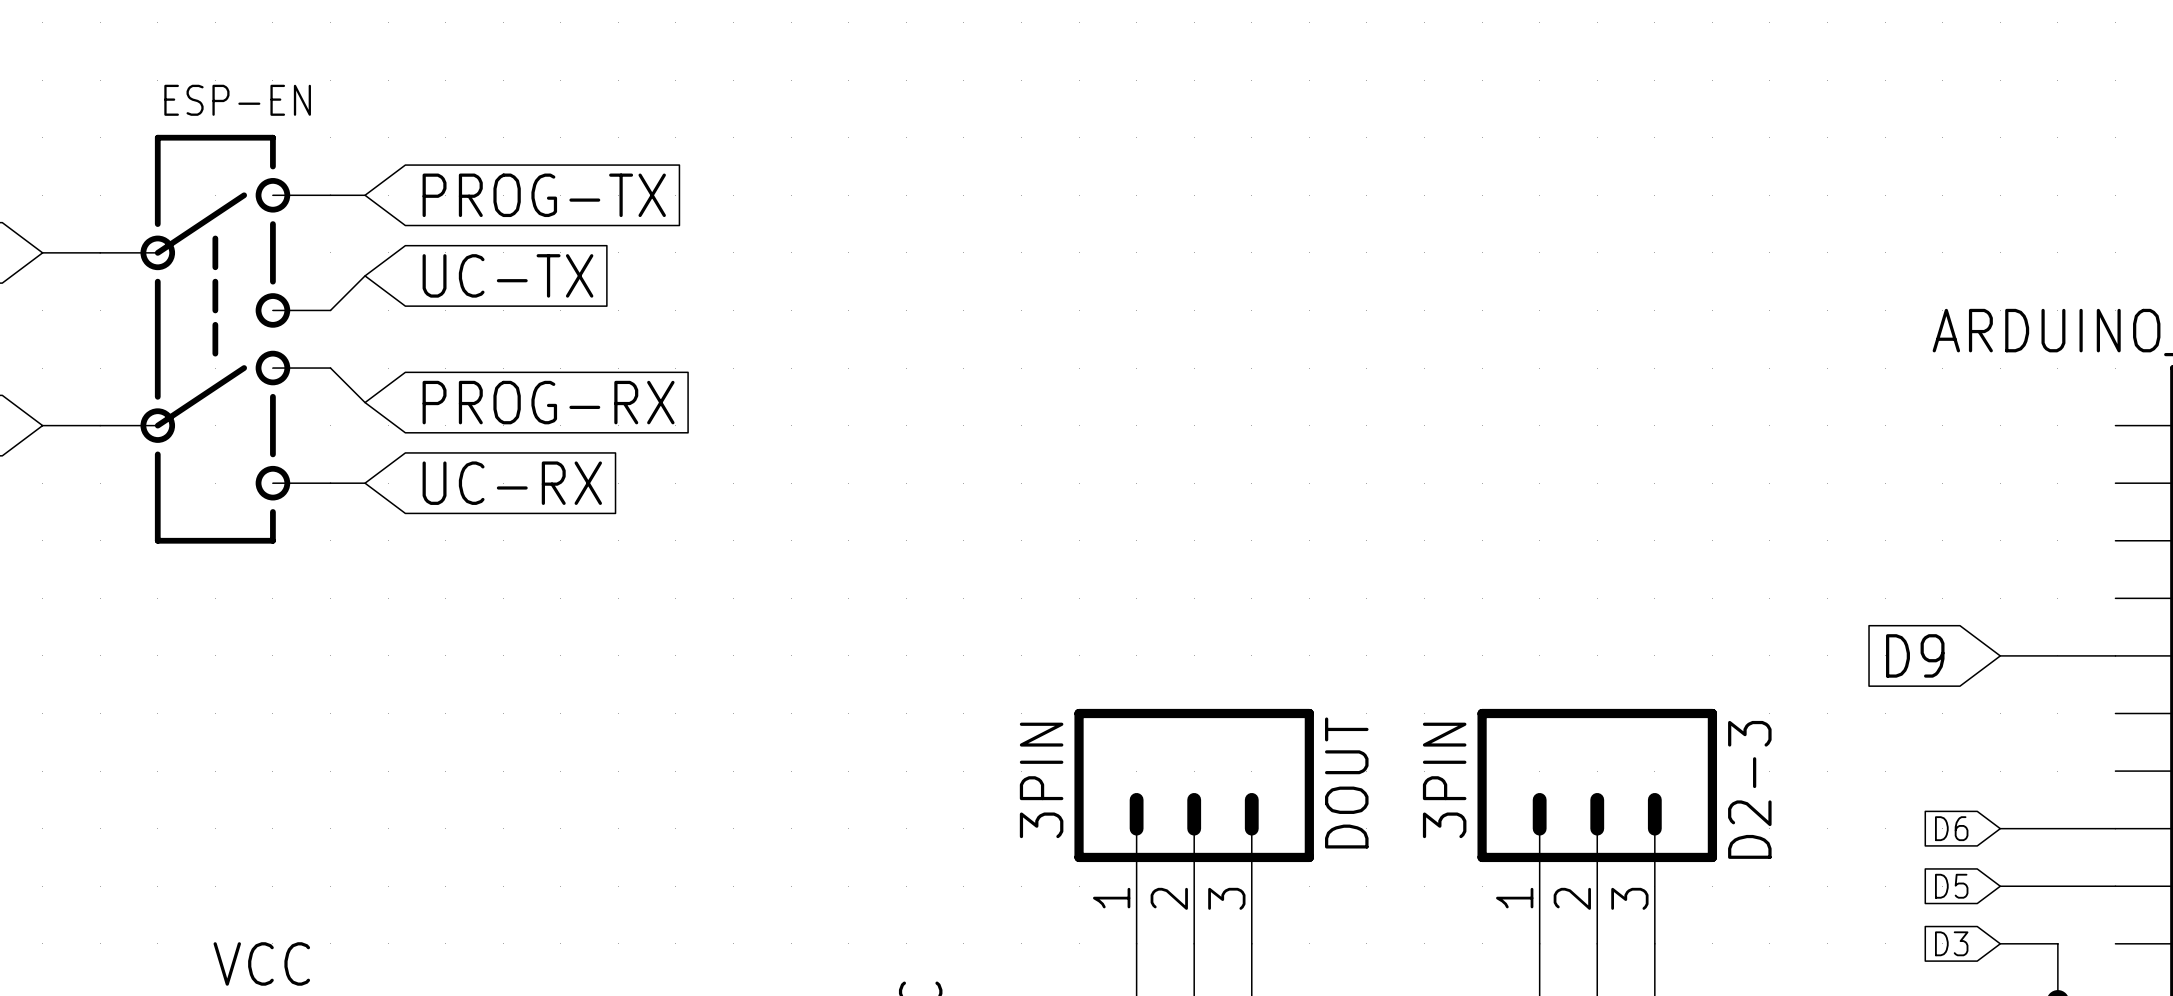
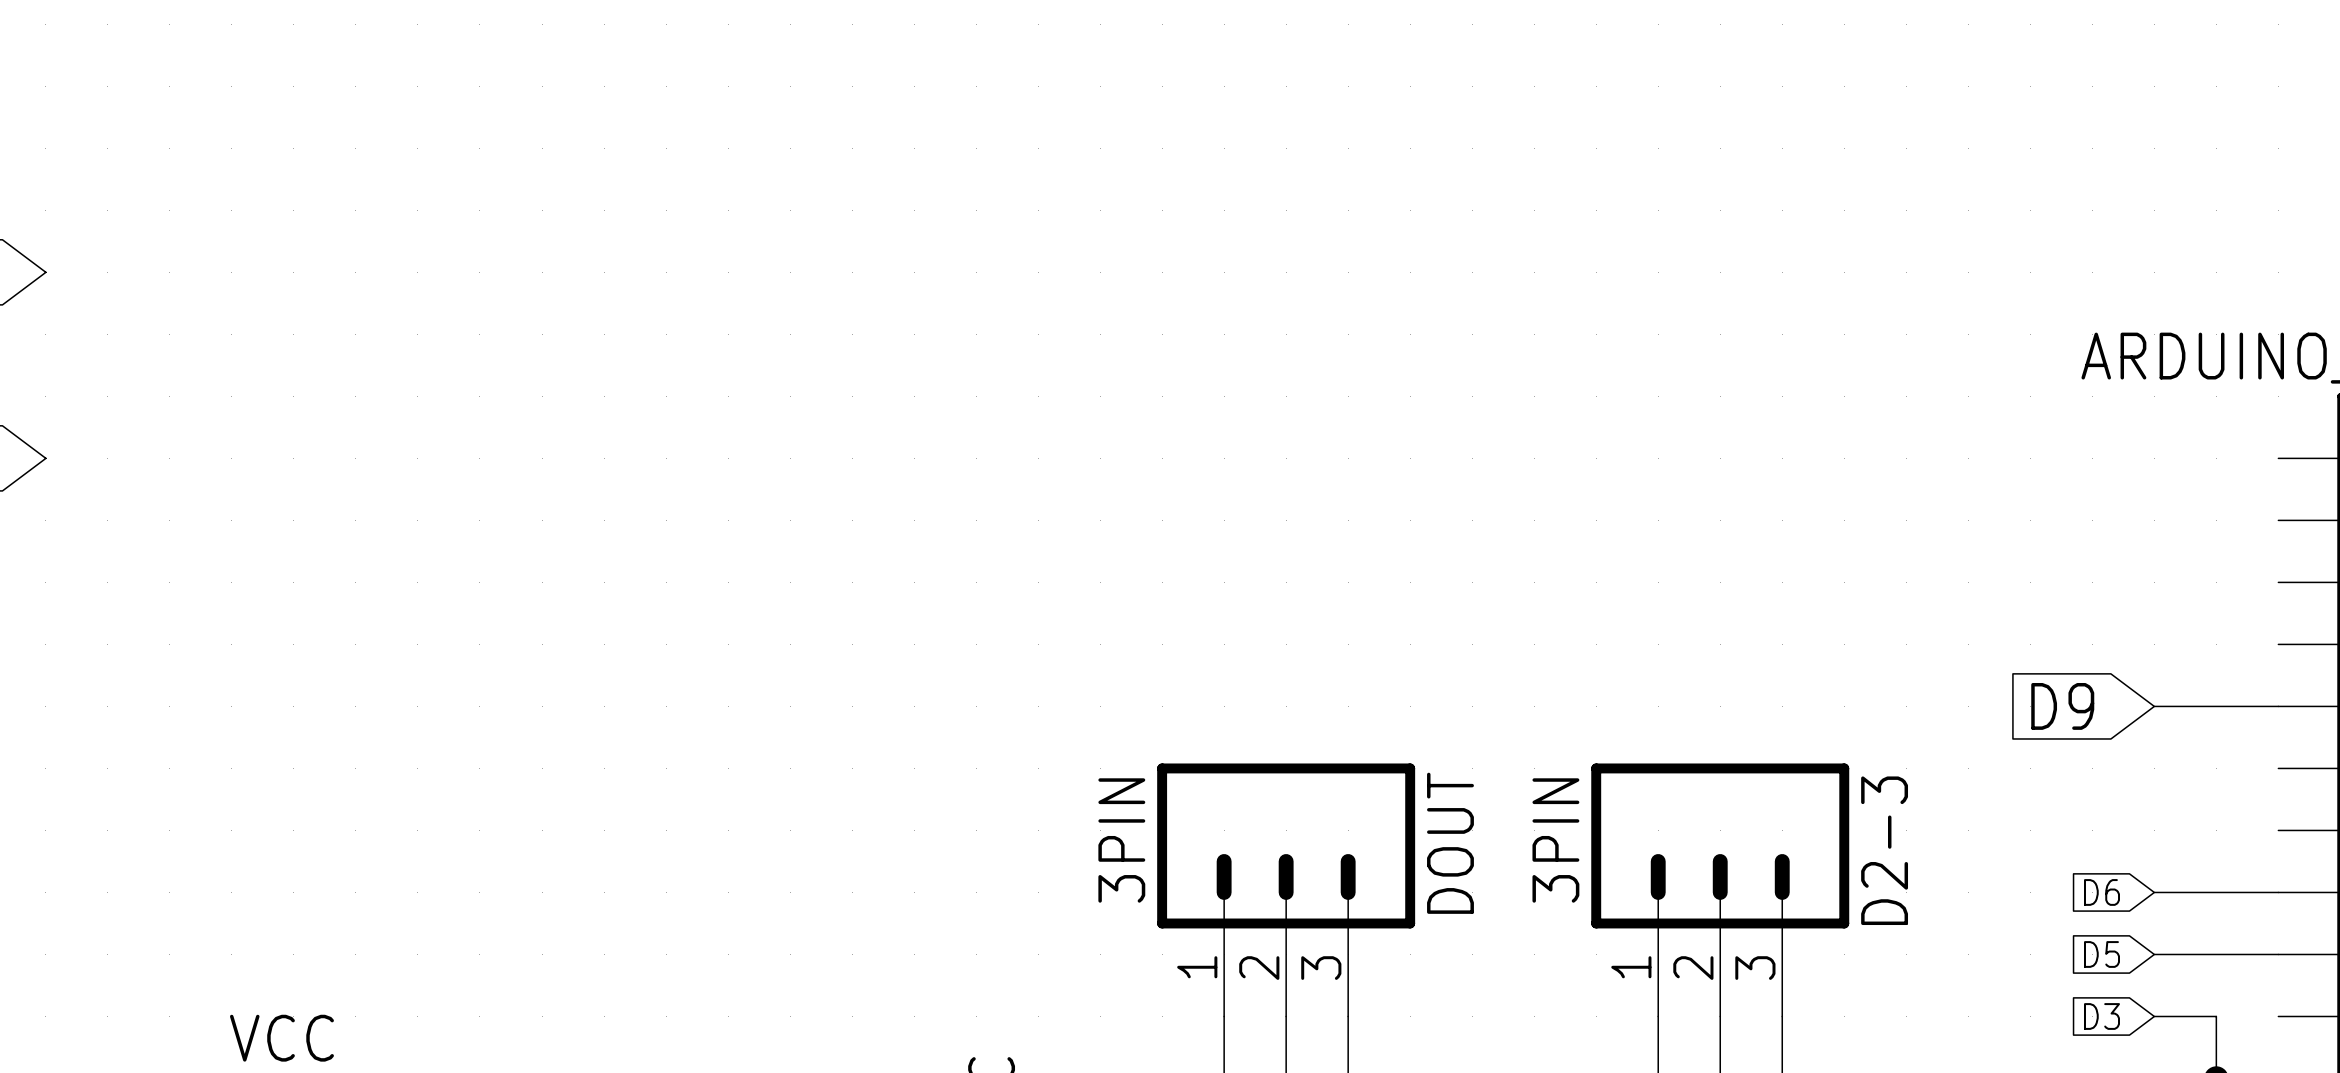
wire: (330, 195) (365, 195) -> none
global label: PROG-TX (544, 195) -> none
wire: (42, 252) (100, 252) -> none
wire: (365, 275) (330, 310) -> none
global label: UC-TX (507, 275) -> none
ESP-EN: (215, 339) -> none
wire: (330, 368) (365, 402) -> none
global label: PROG-RX (548, 402) -> none
wire: (42, 425) (100, 425) -> none
wire: (330, 483) (365, 483) -> none
global label: UC-RX (512, 483) -> none

